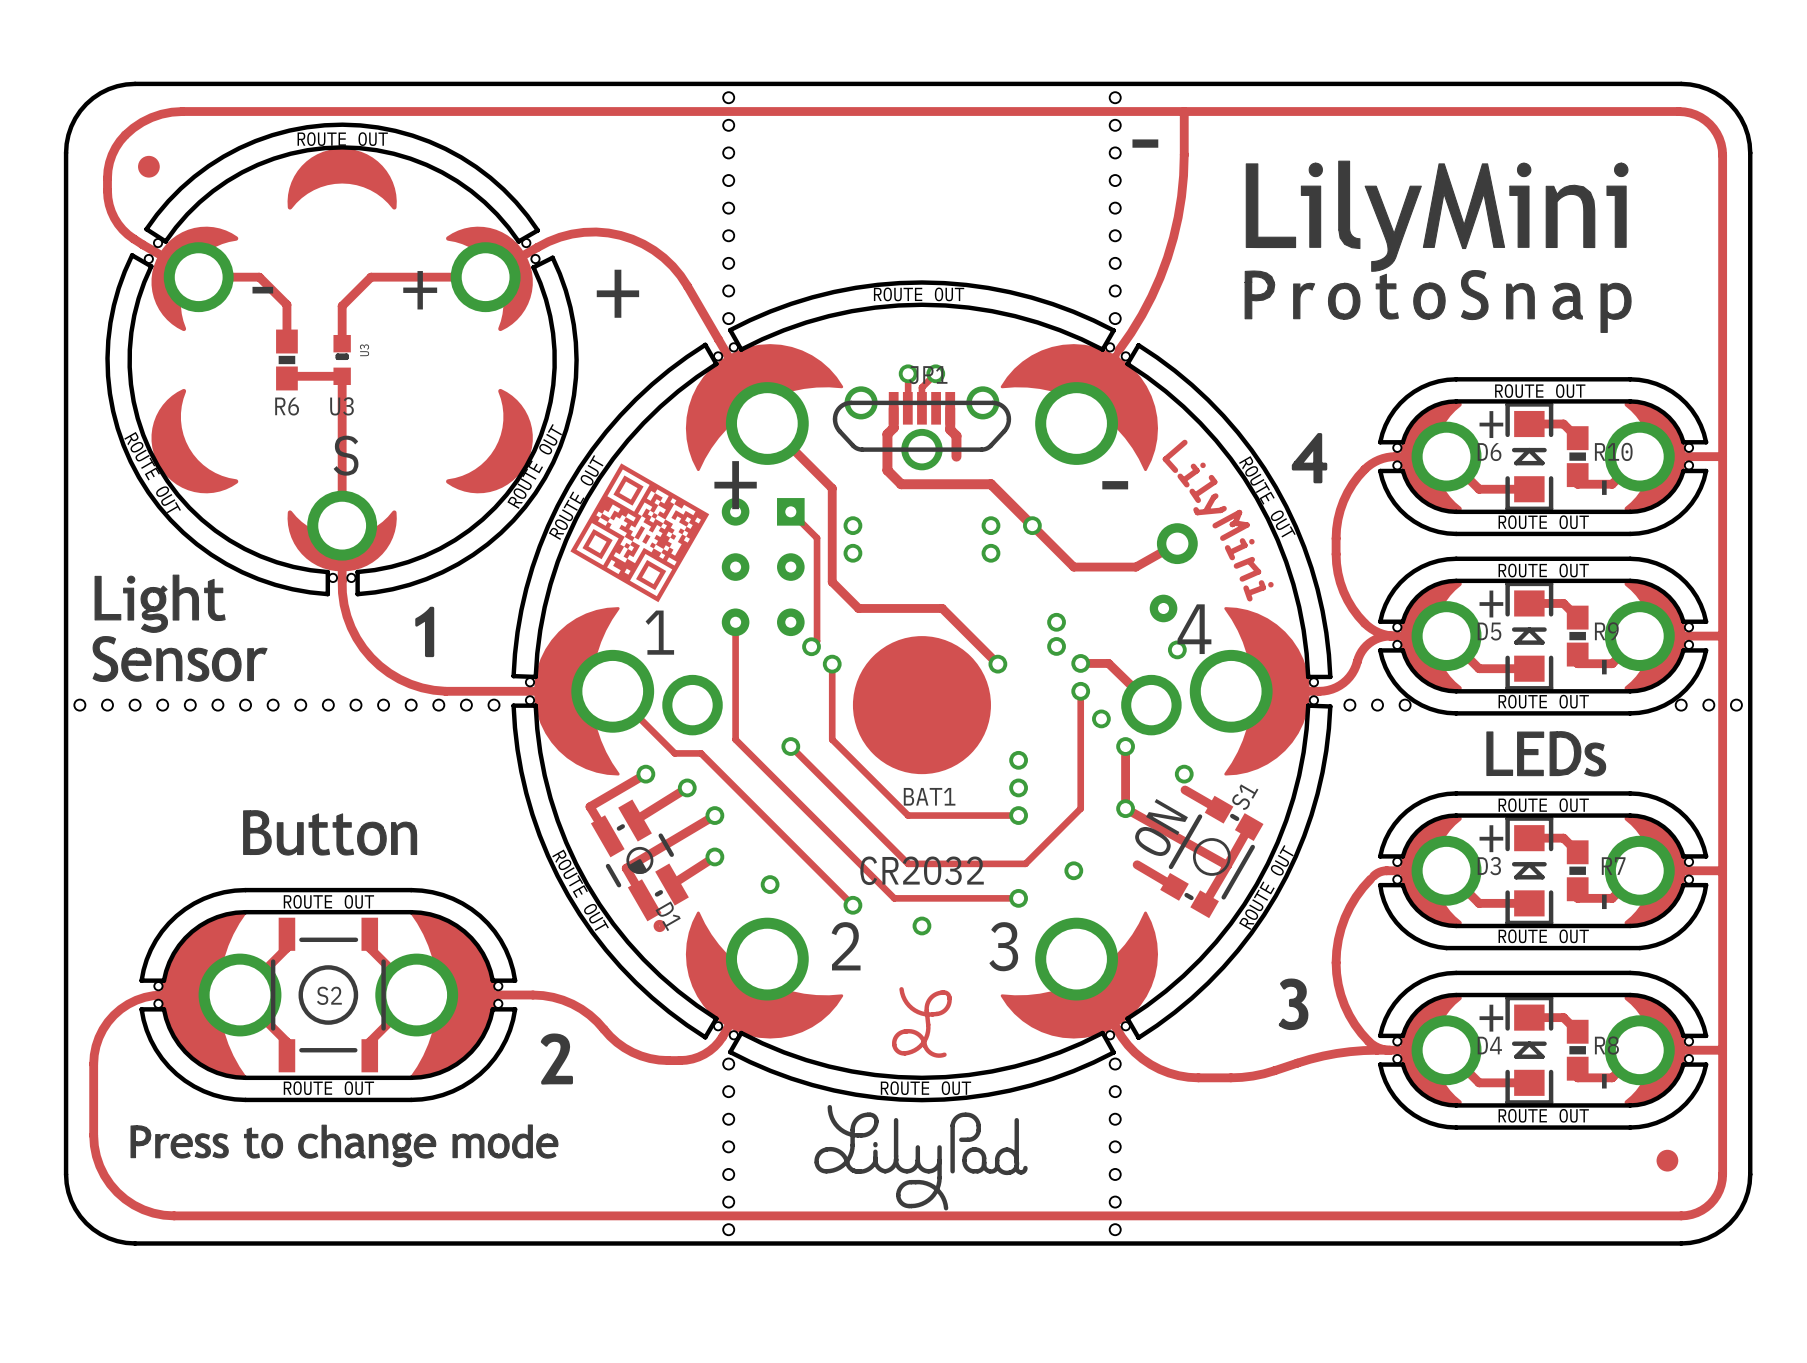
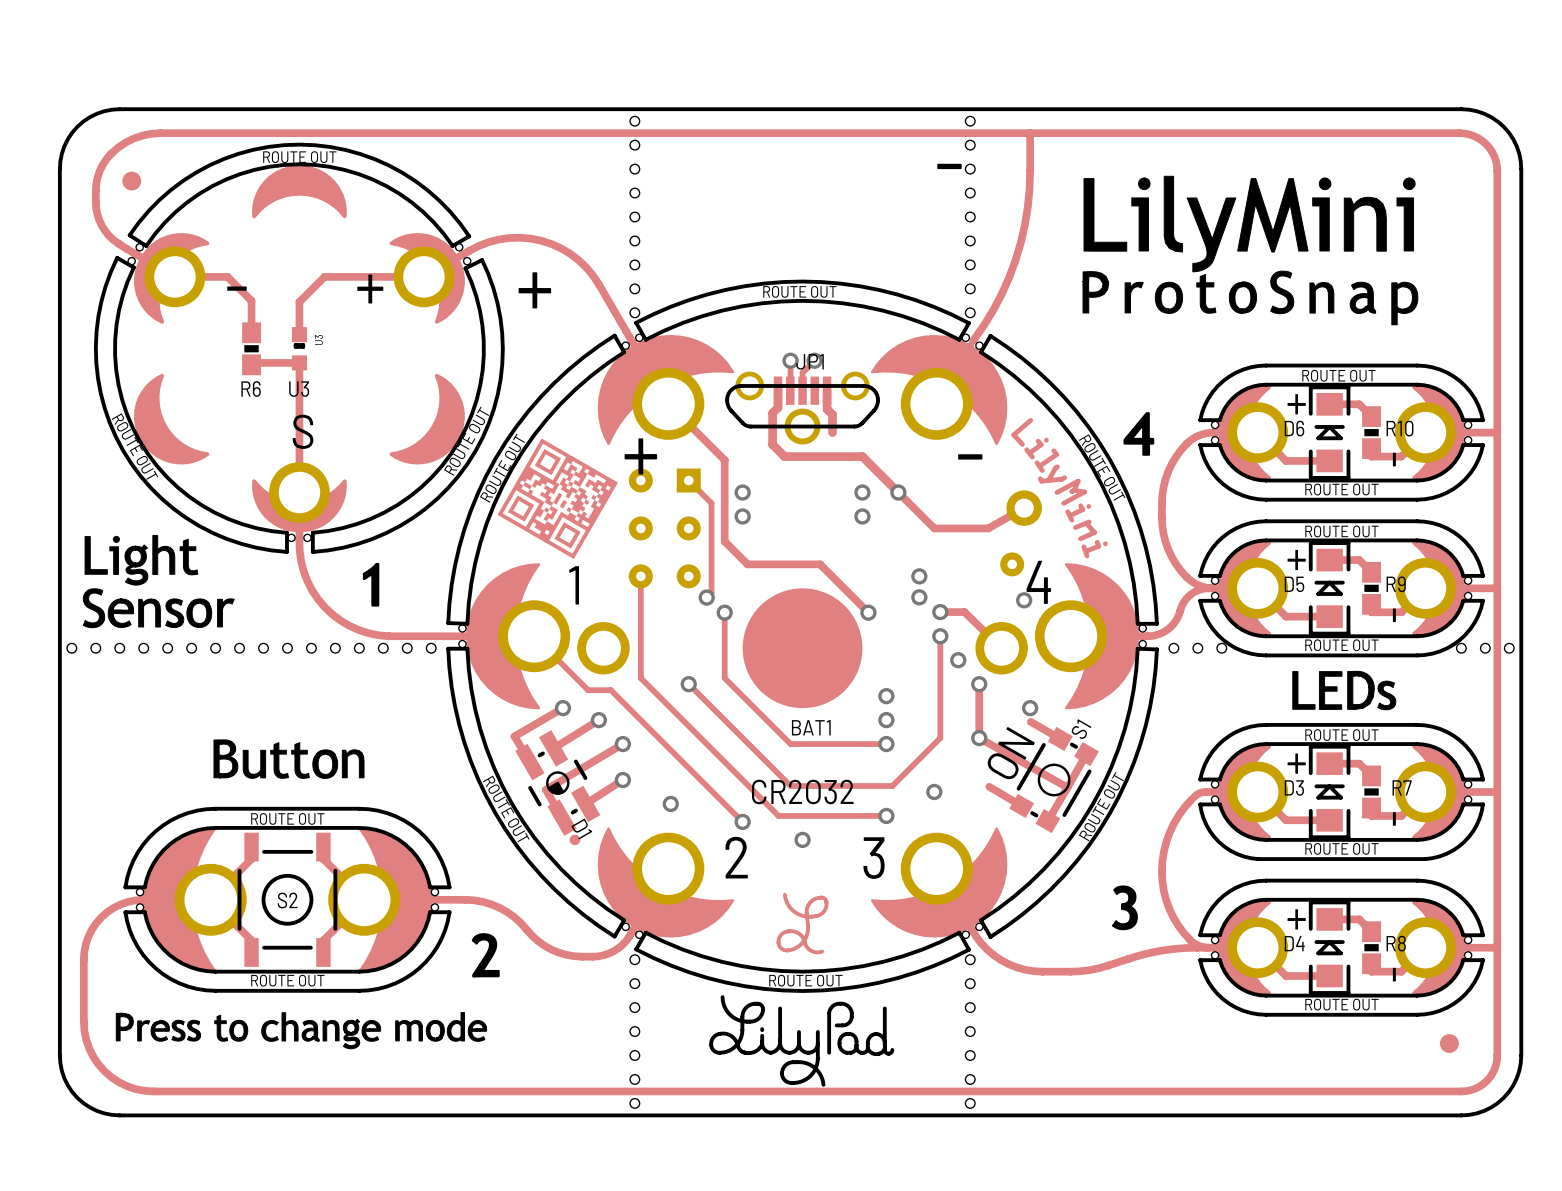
text position: - (1145, 143) -> - (949, 166)

